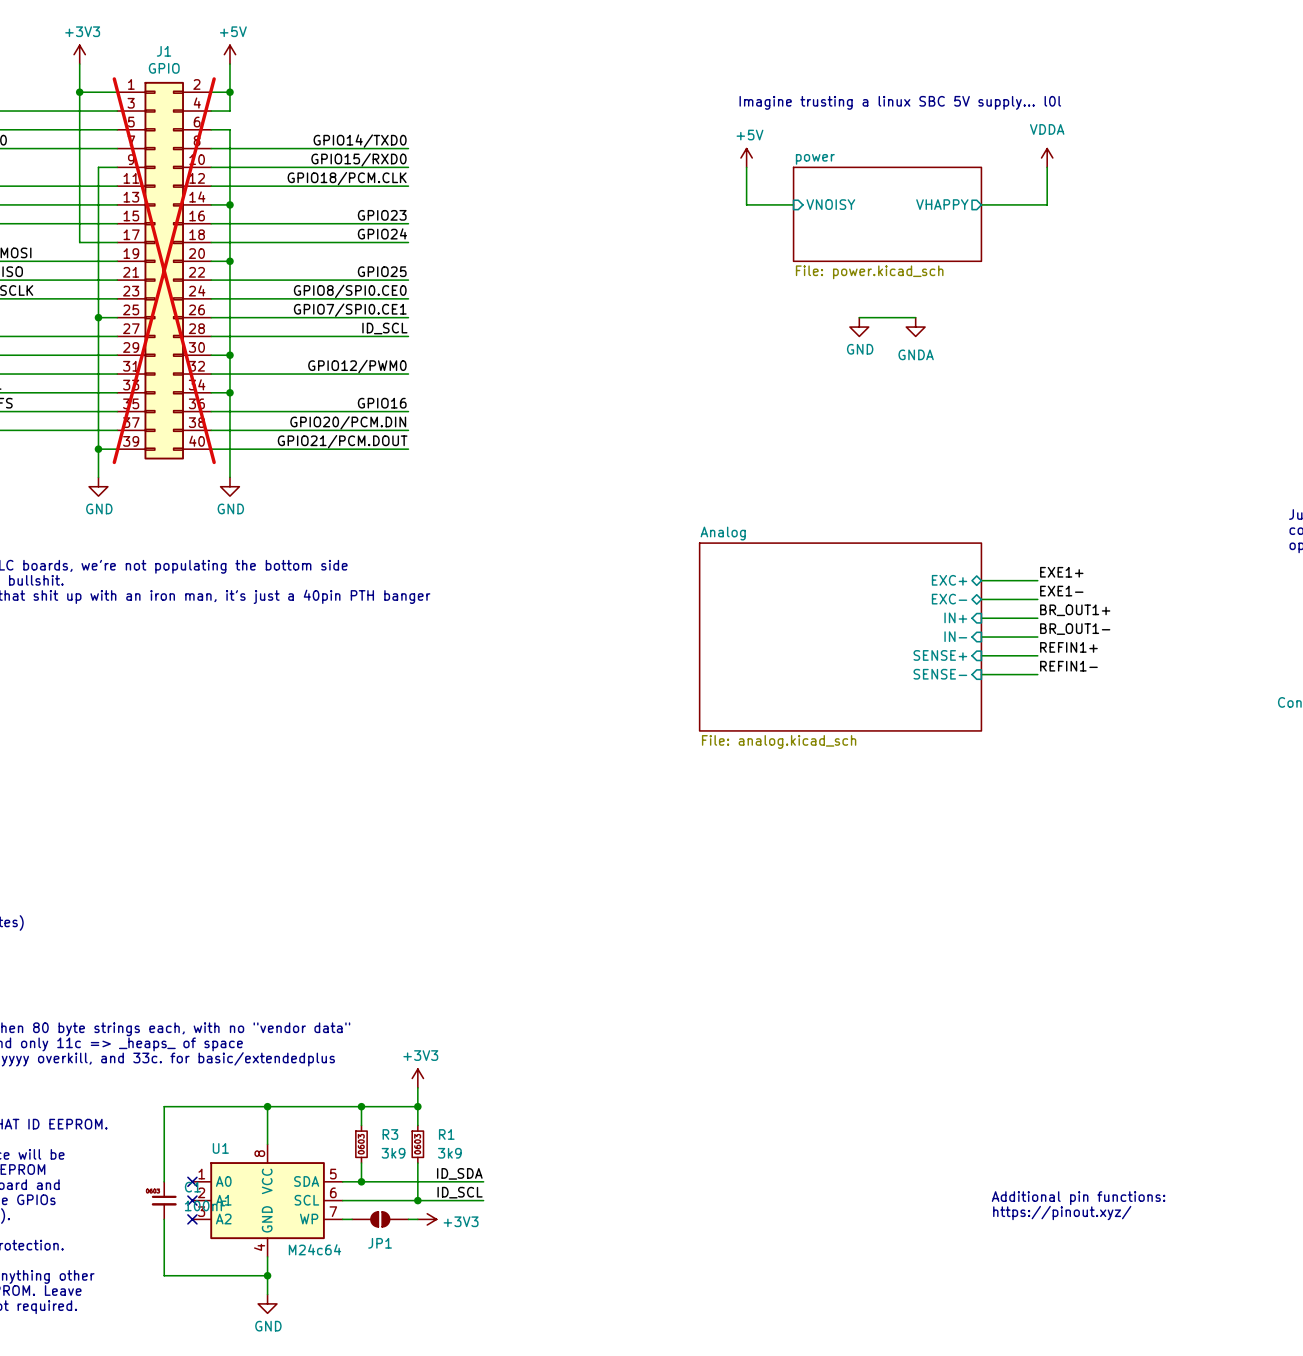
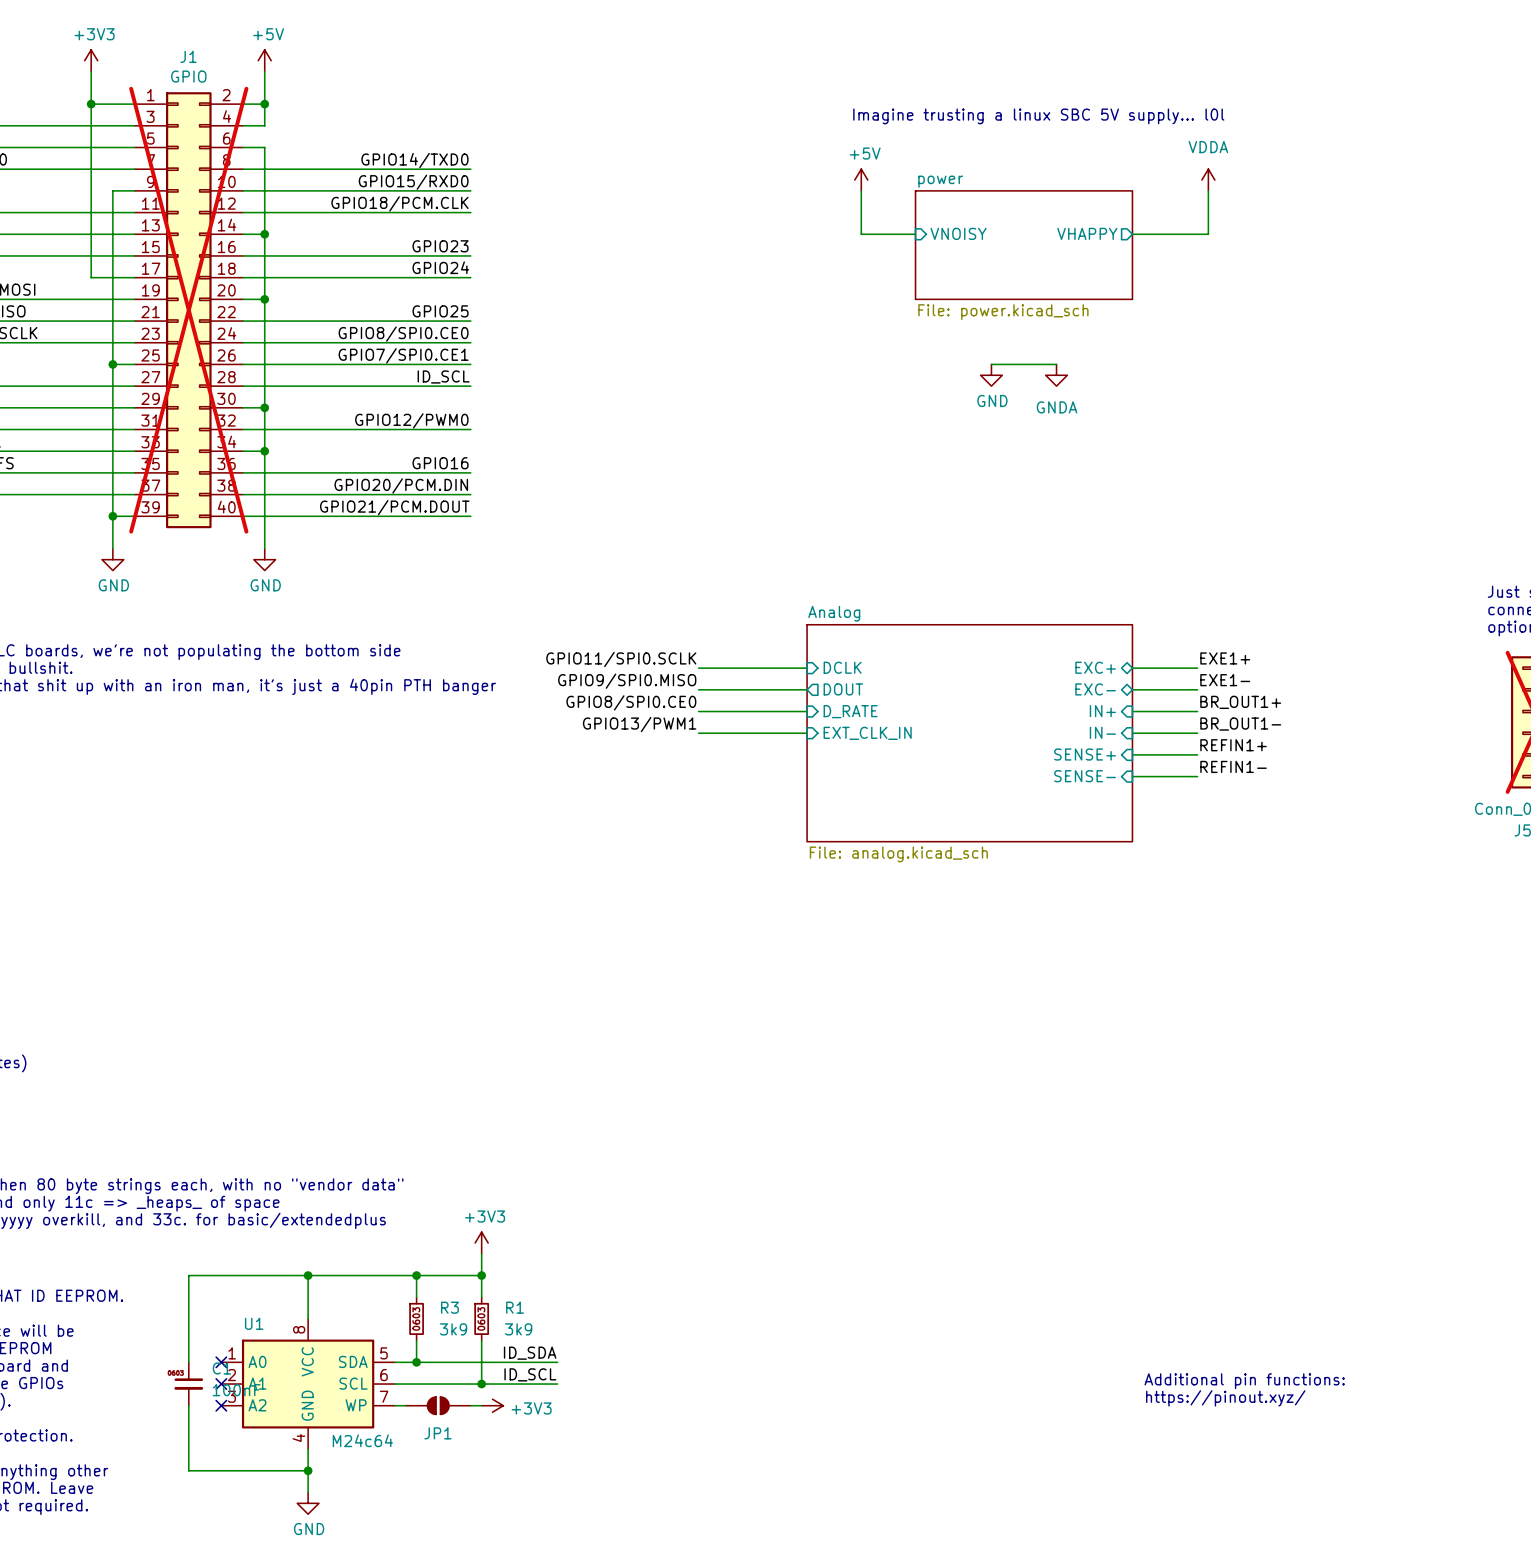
label: none -> GPIO11/SPI0.SCLK (621, 659)
wire: none -> (698, 668) (807, 668)
sheet pin: none -> DCLK (842, 667)
label: none -> GPIO9/SPI0.MISO (627, 681)
wire: none -> (698, 689) (807, 689)
sheet pin: none -> DOUT (843, 689)
label: none -> GPIO8/SPI0.CE0 (631, 702)
wire: none -> (698, 711) (807, 711)
sheet pin: none -> D_RATE (850, 711)
label: none -> GPIO13/PWM1 (639, 724)
wire: none -> (698, 733) (807, 733)
sheet pin: none -> EXT_CLK_IN (867, 733)

